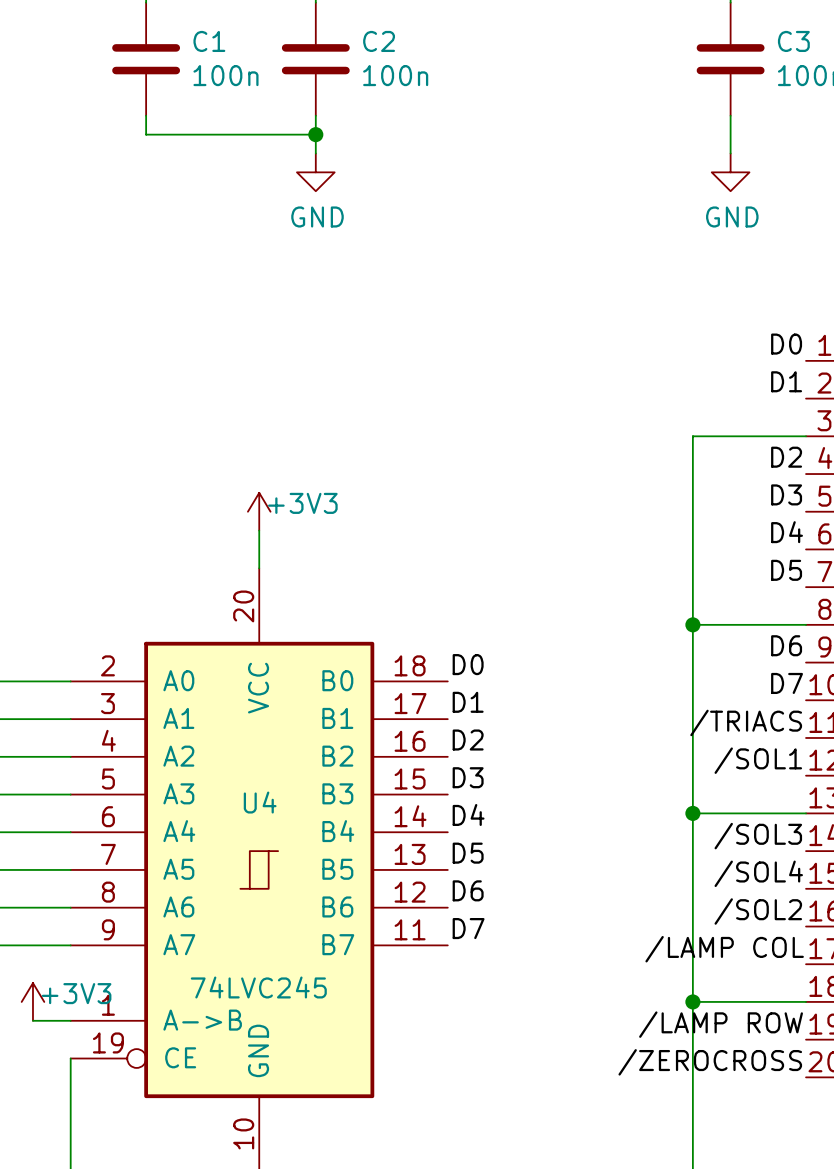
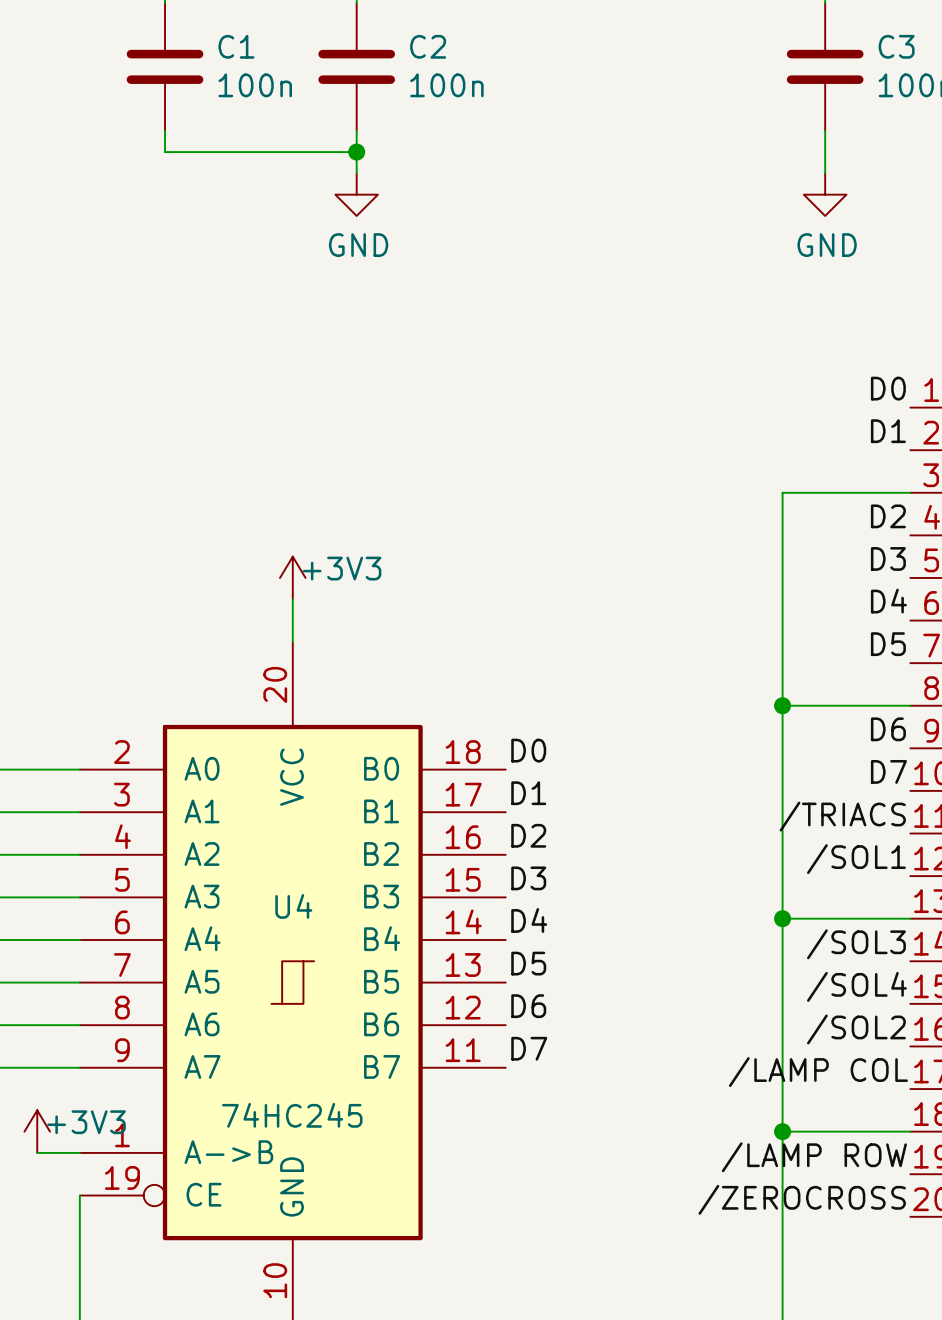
U4 value: 74LVC245 (258, 987) -> 74HC245 (292, 1115)

